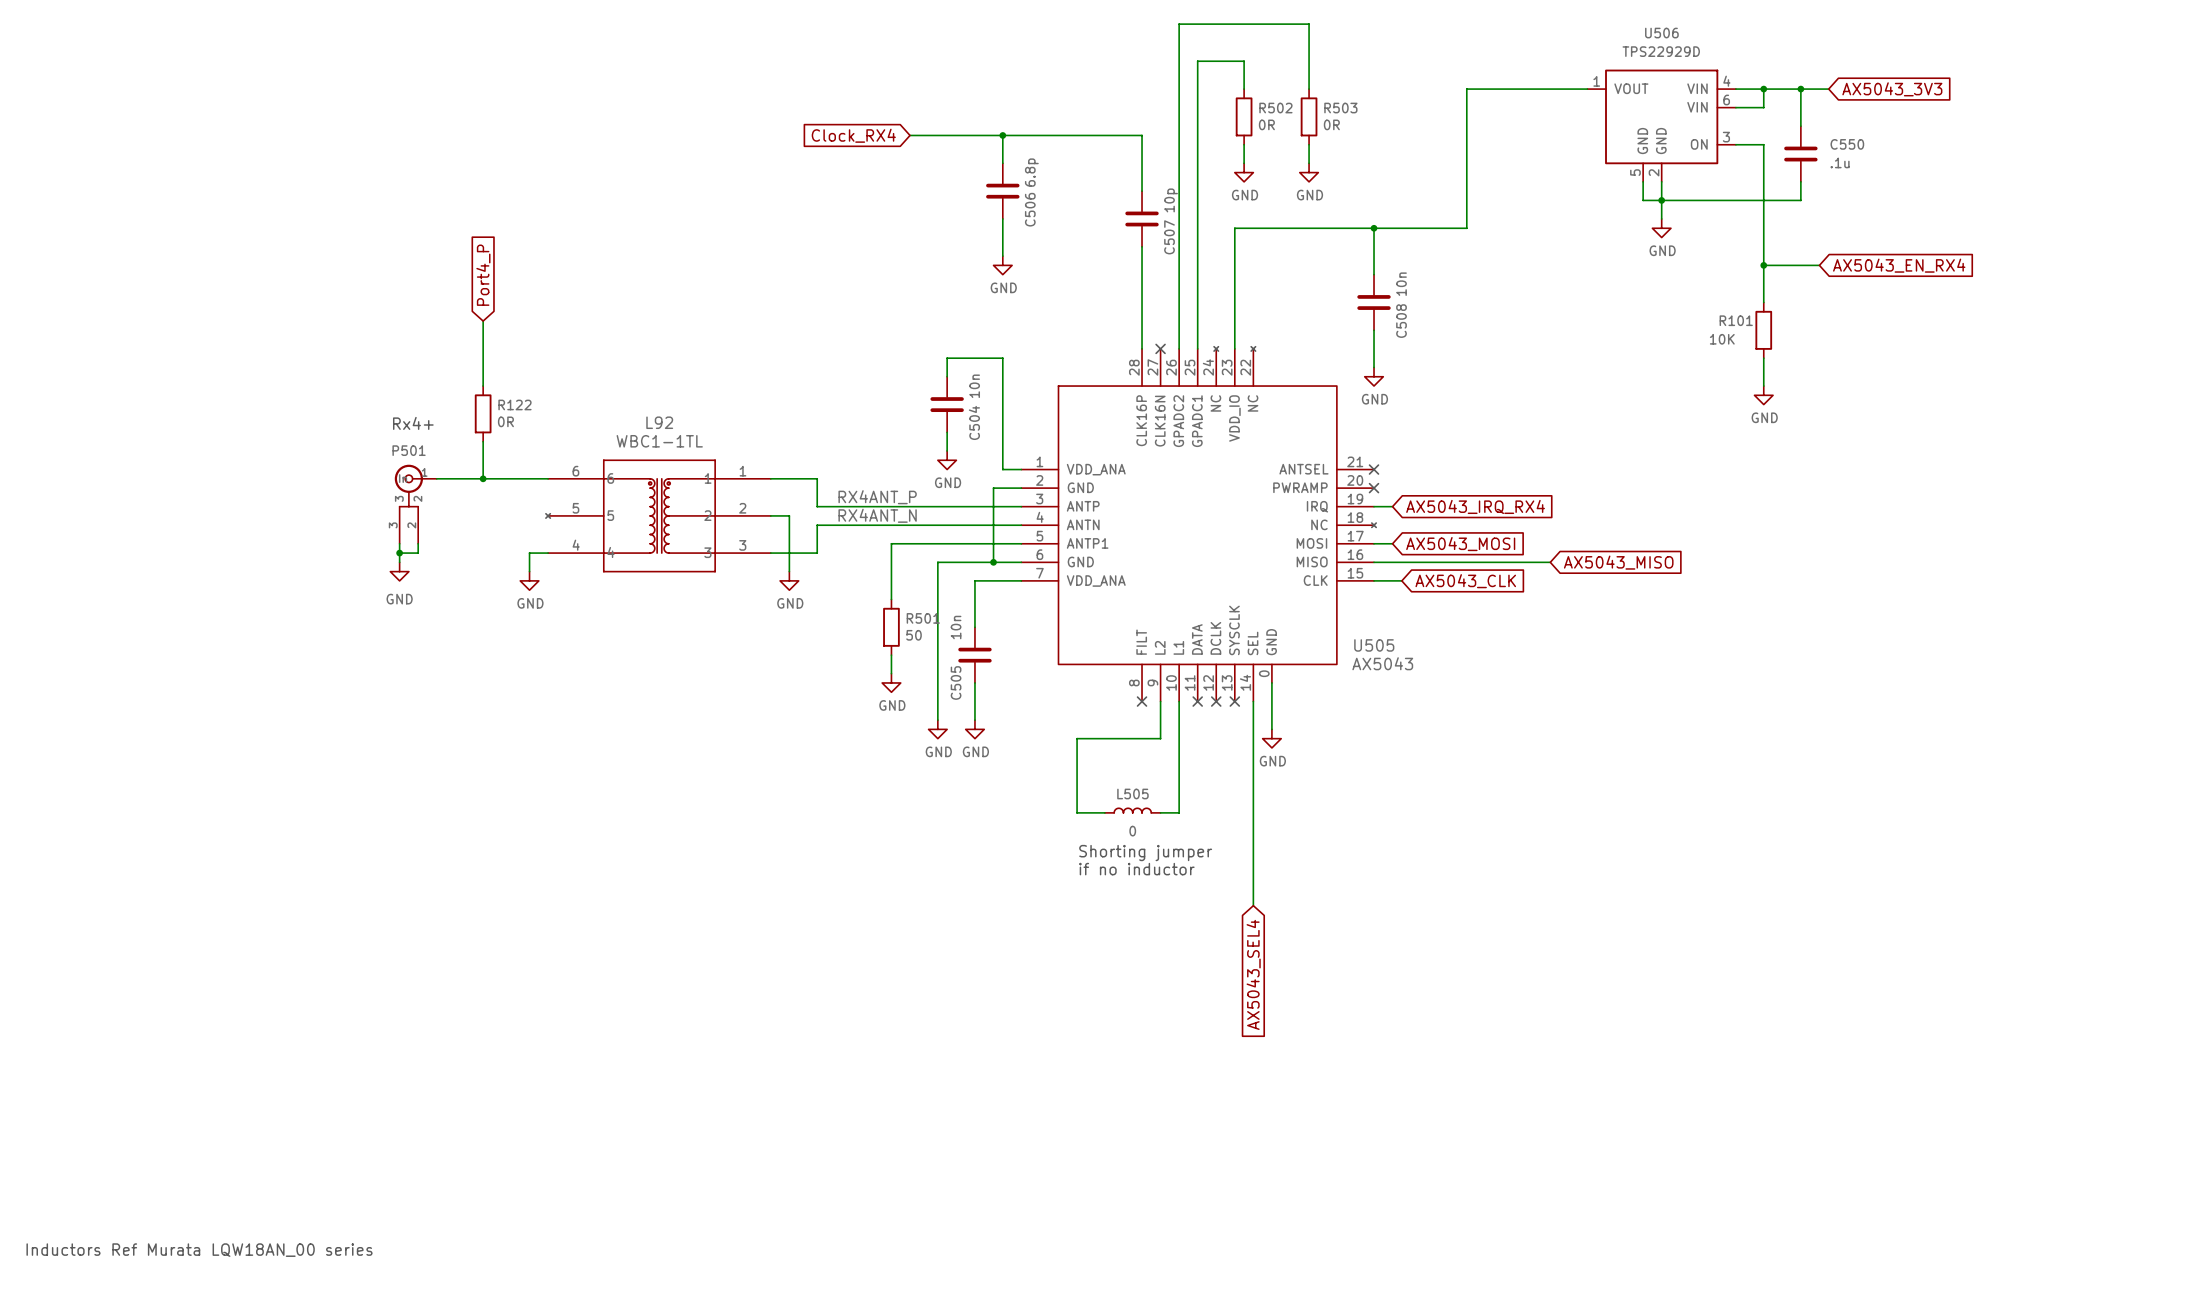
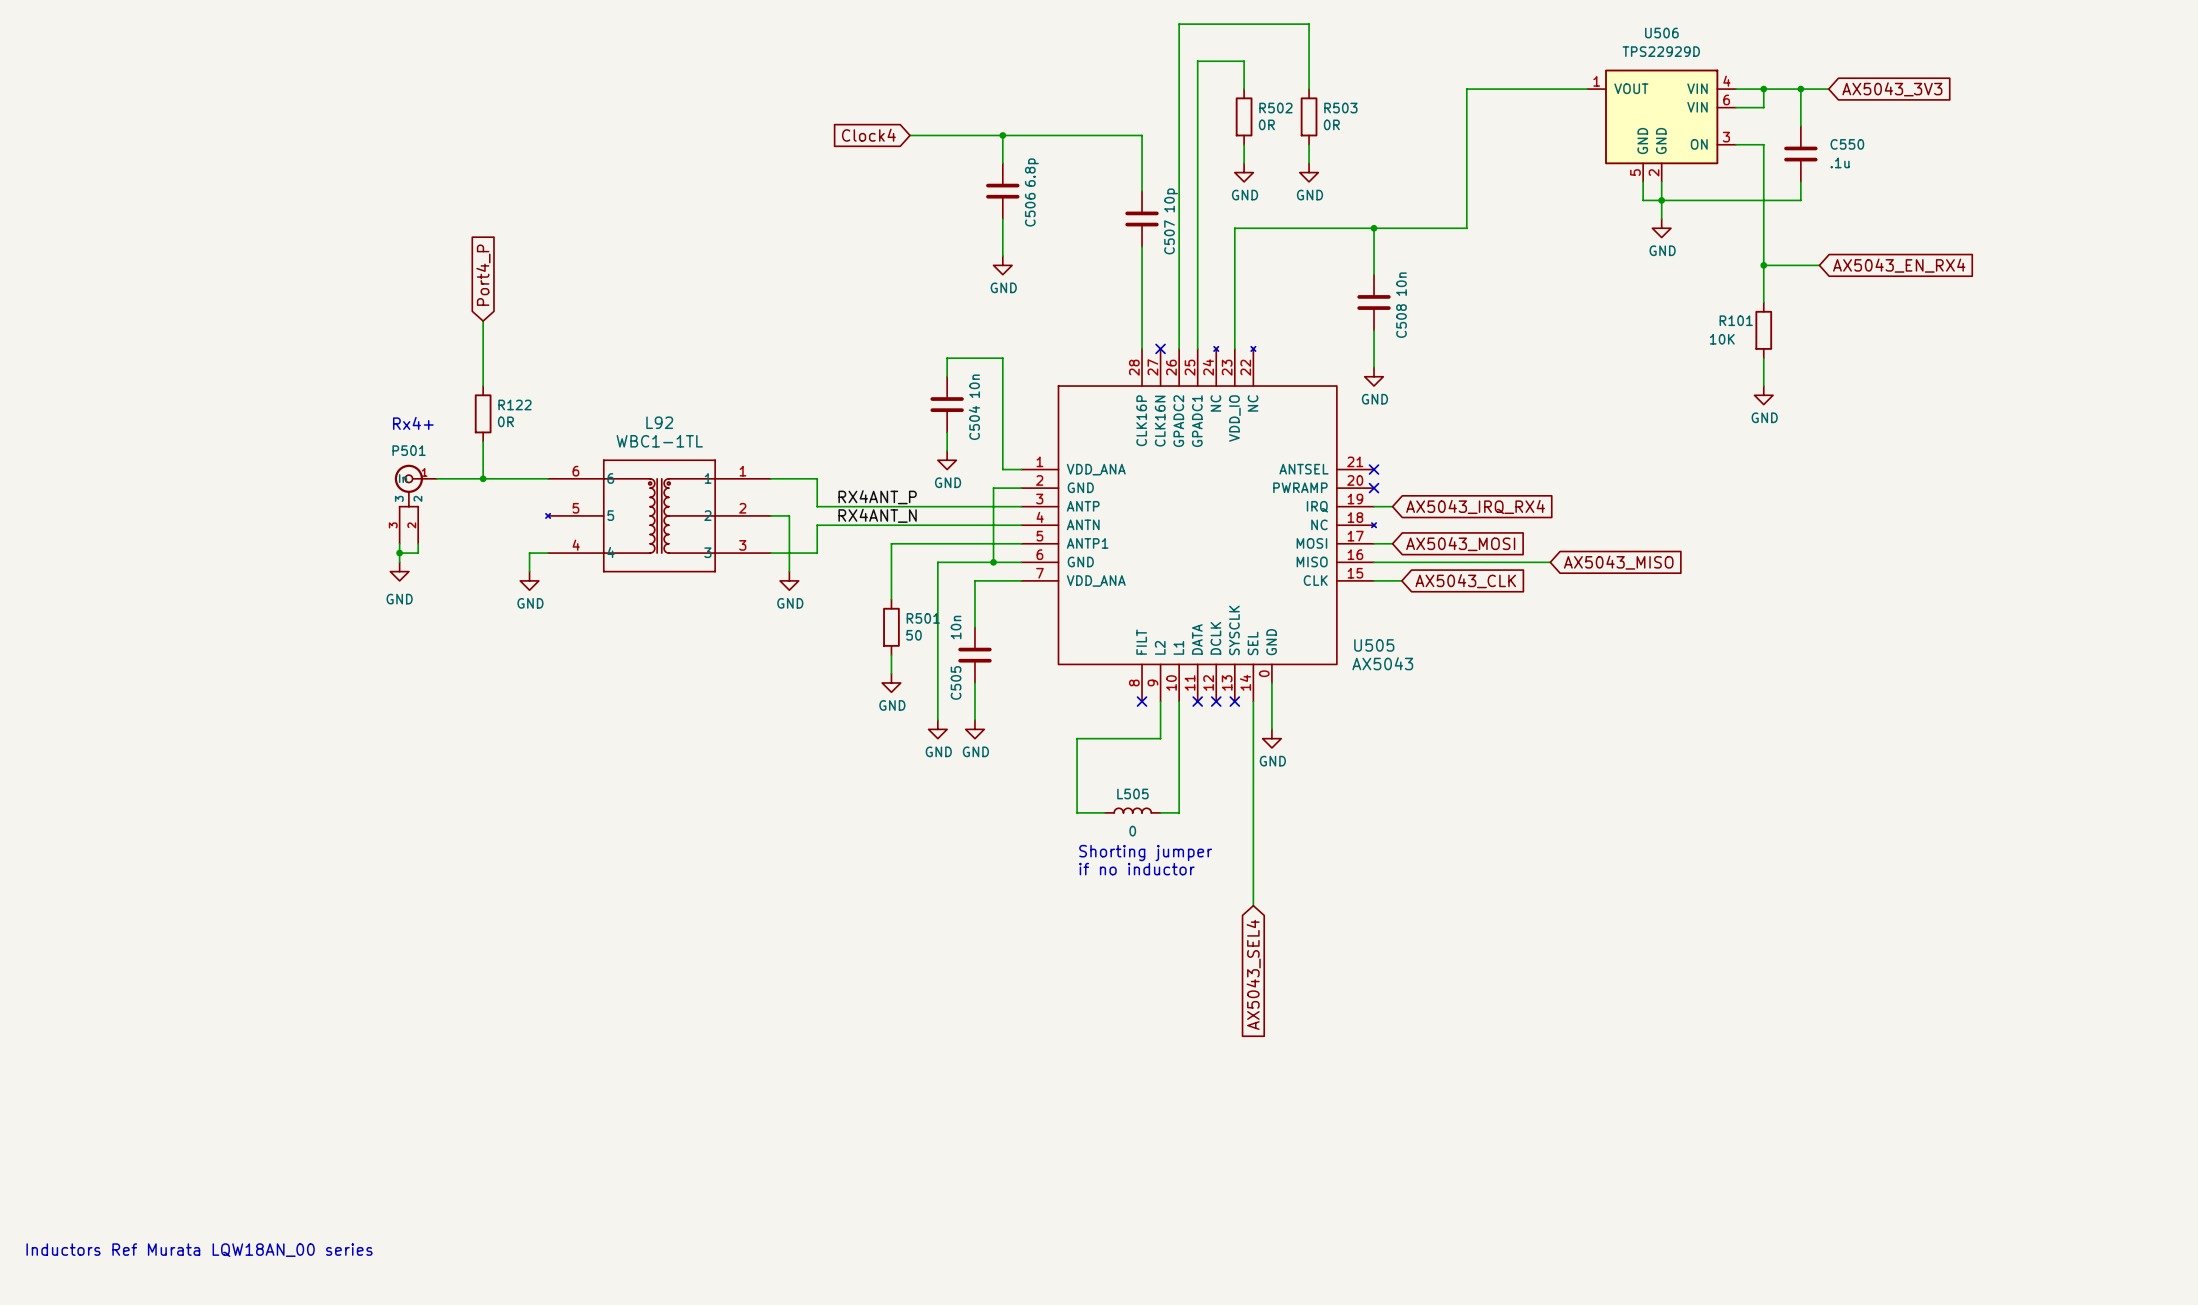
global label: Clock_RX4 (853, 135) -> Clock4 (868, 135)

